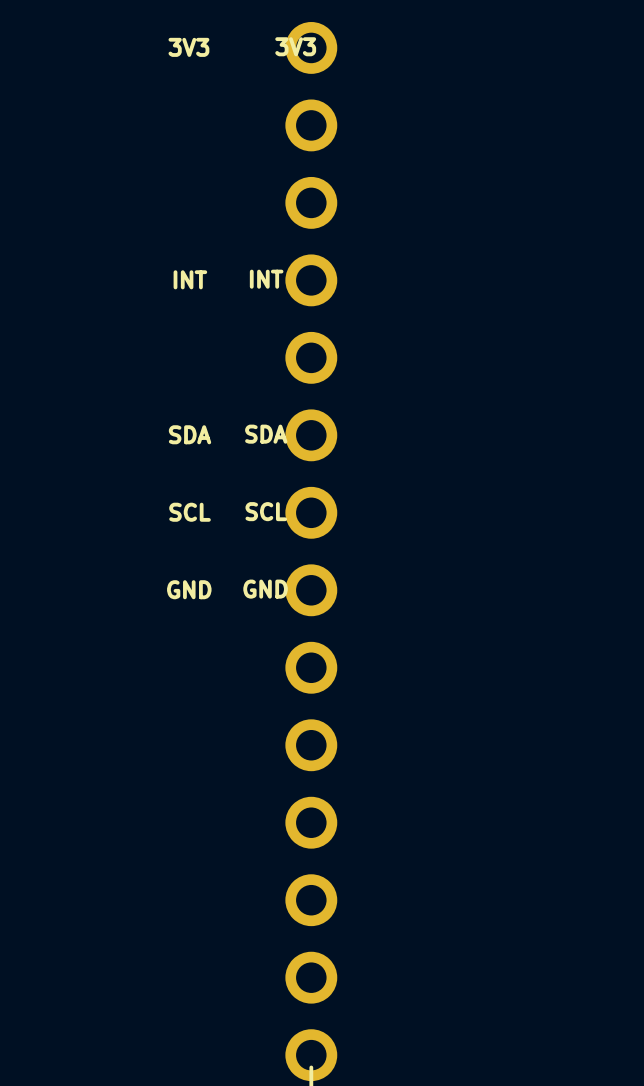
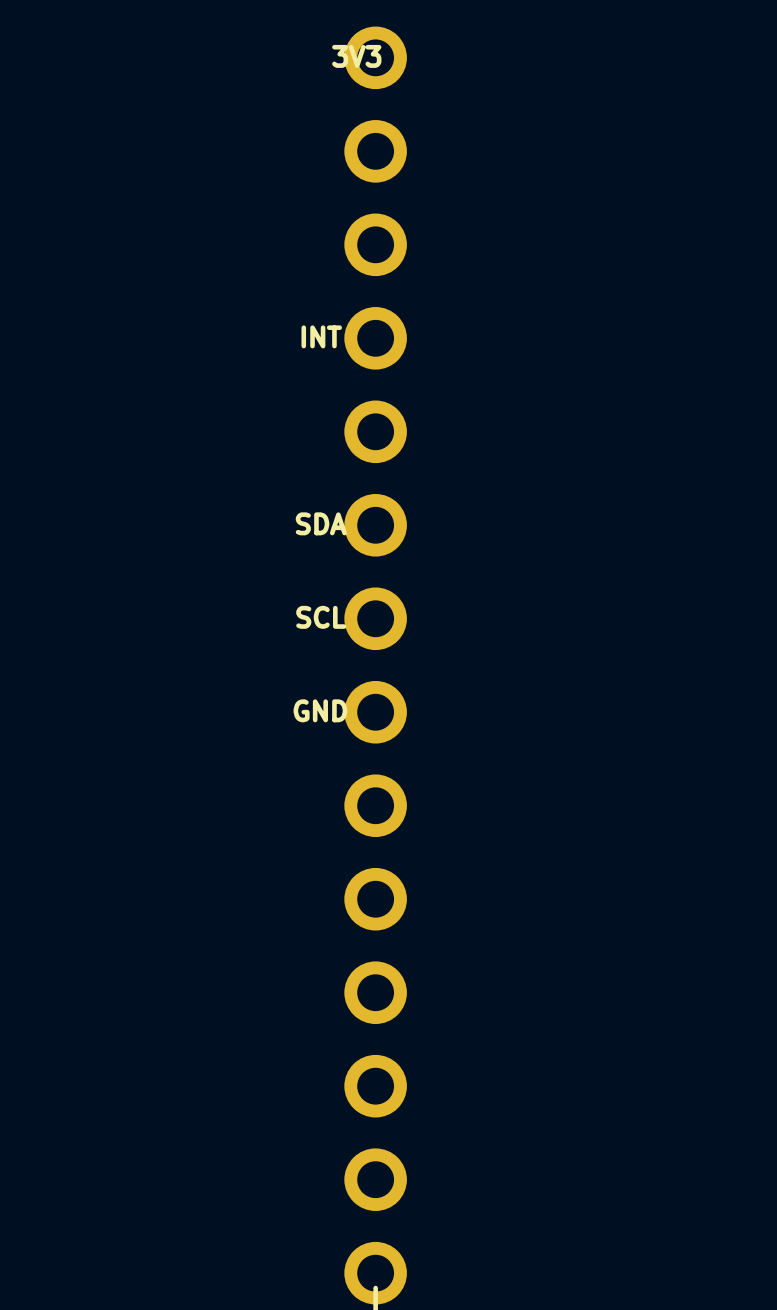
text: 3V3 (188, 47) -> none
text: INT (190, 279) -> none
text: SDA (190, 434) -> none
text: SCL (190, 512) -> none
text: GND (189, 589) -> none

